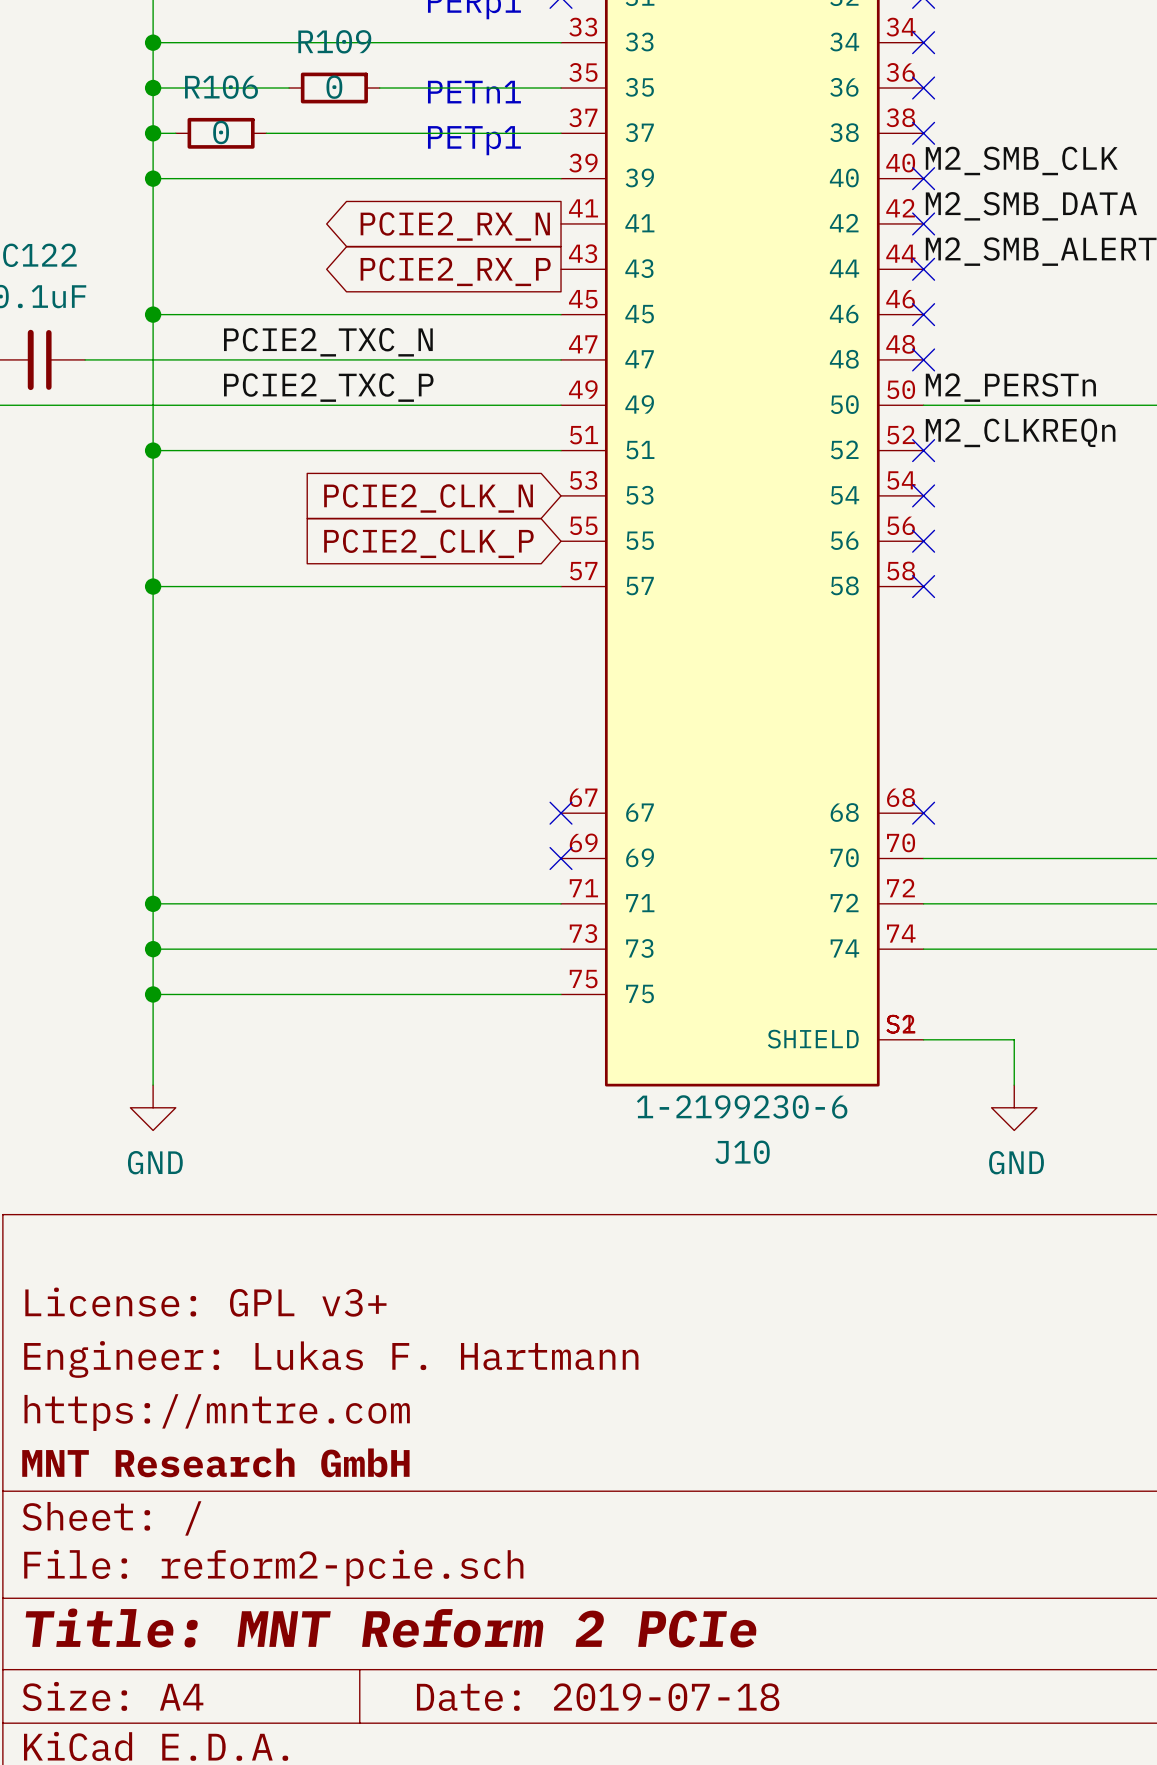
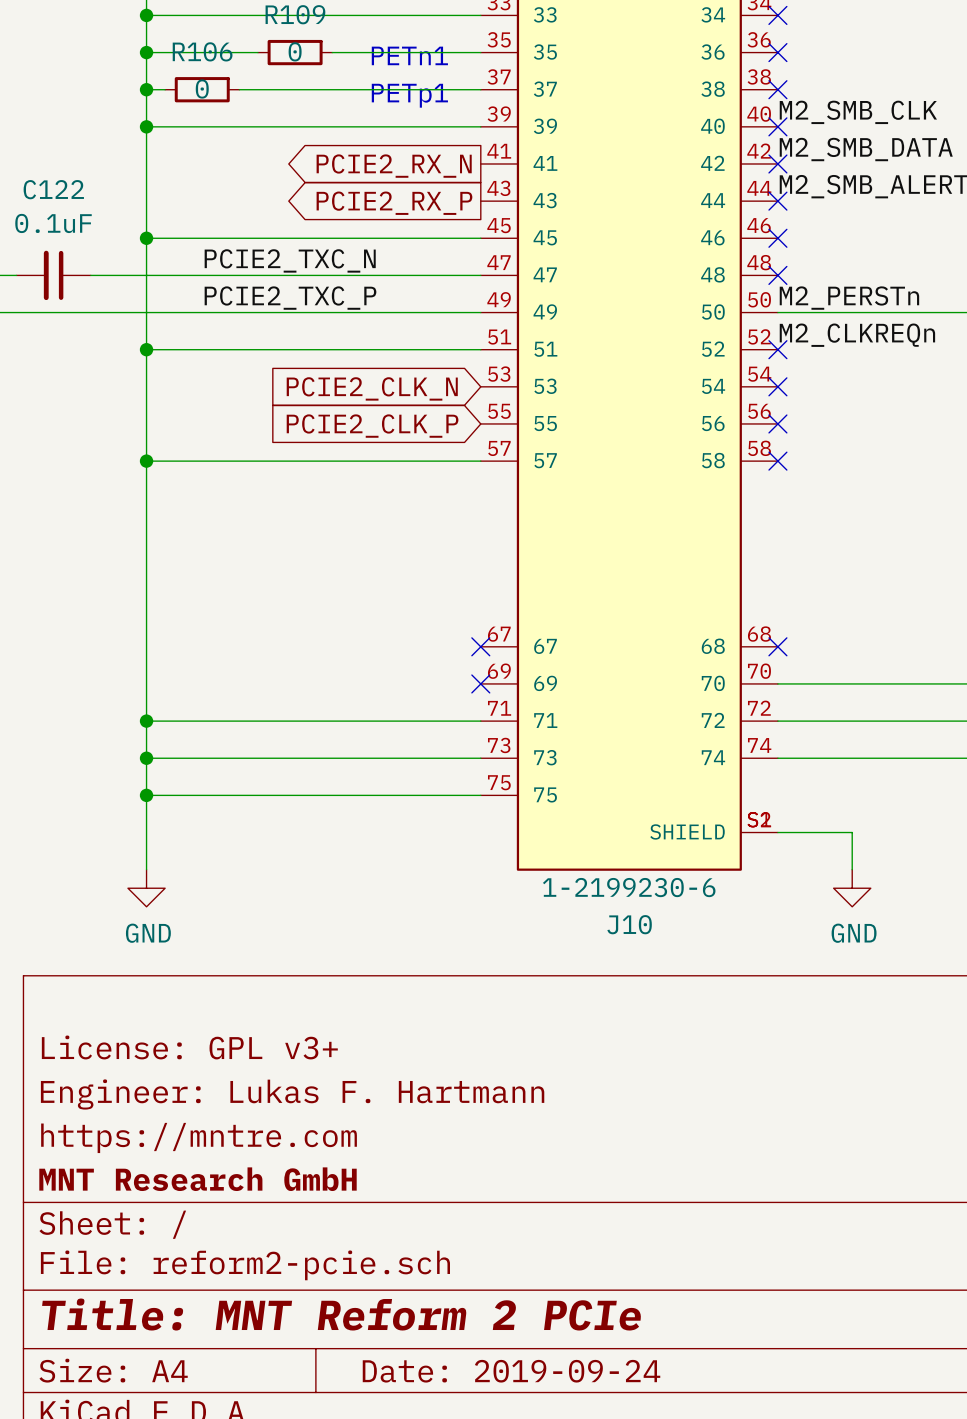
title block: Date: 2019-07-18 (598, 1697) -> Date: 2019-09-24 (511, 1371)

